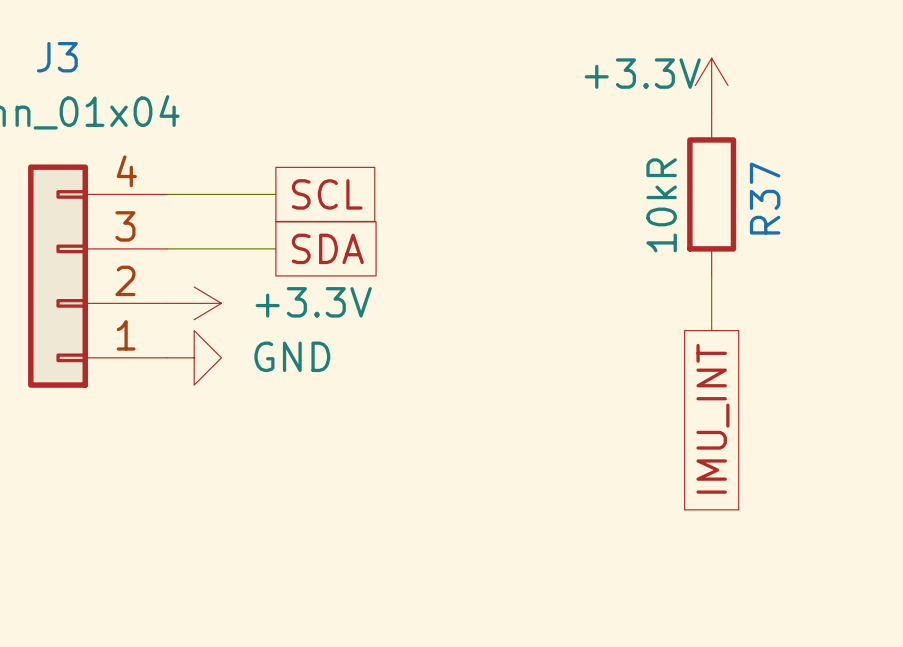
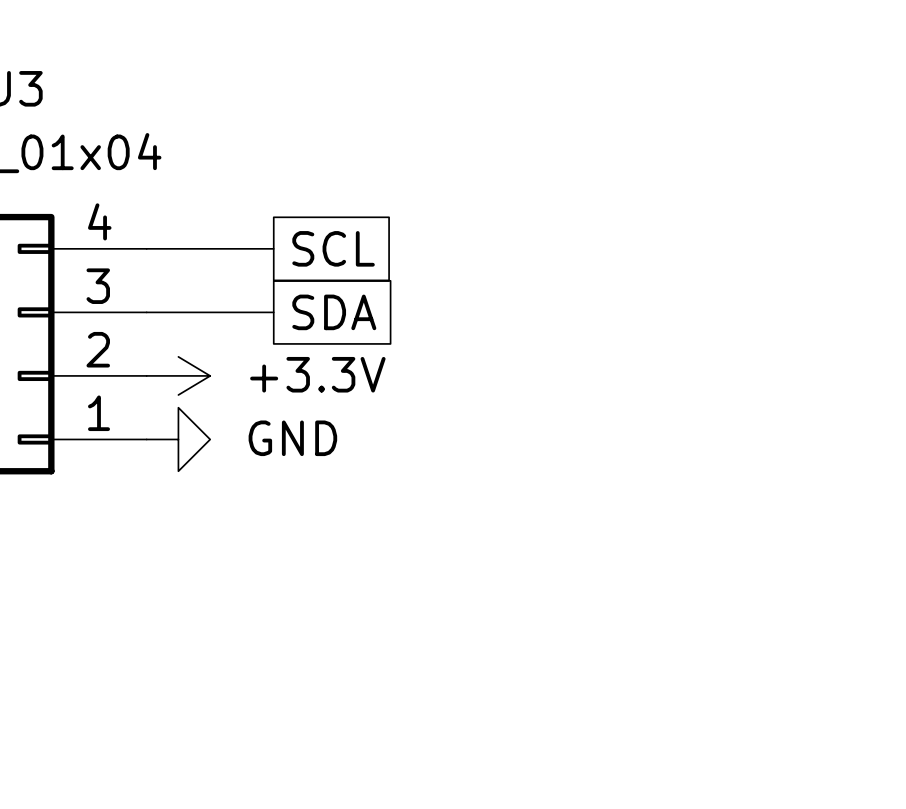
power symbol: +3.3V (711, 85) -> none
R37: 10kR (711, 194) -> none
wire: (711, 276) (711, 330) -> none
global label: IMU_INT (712, 418) -> none

